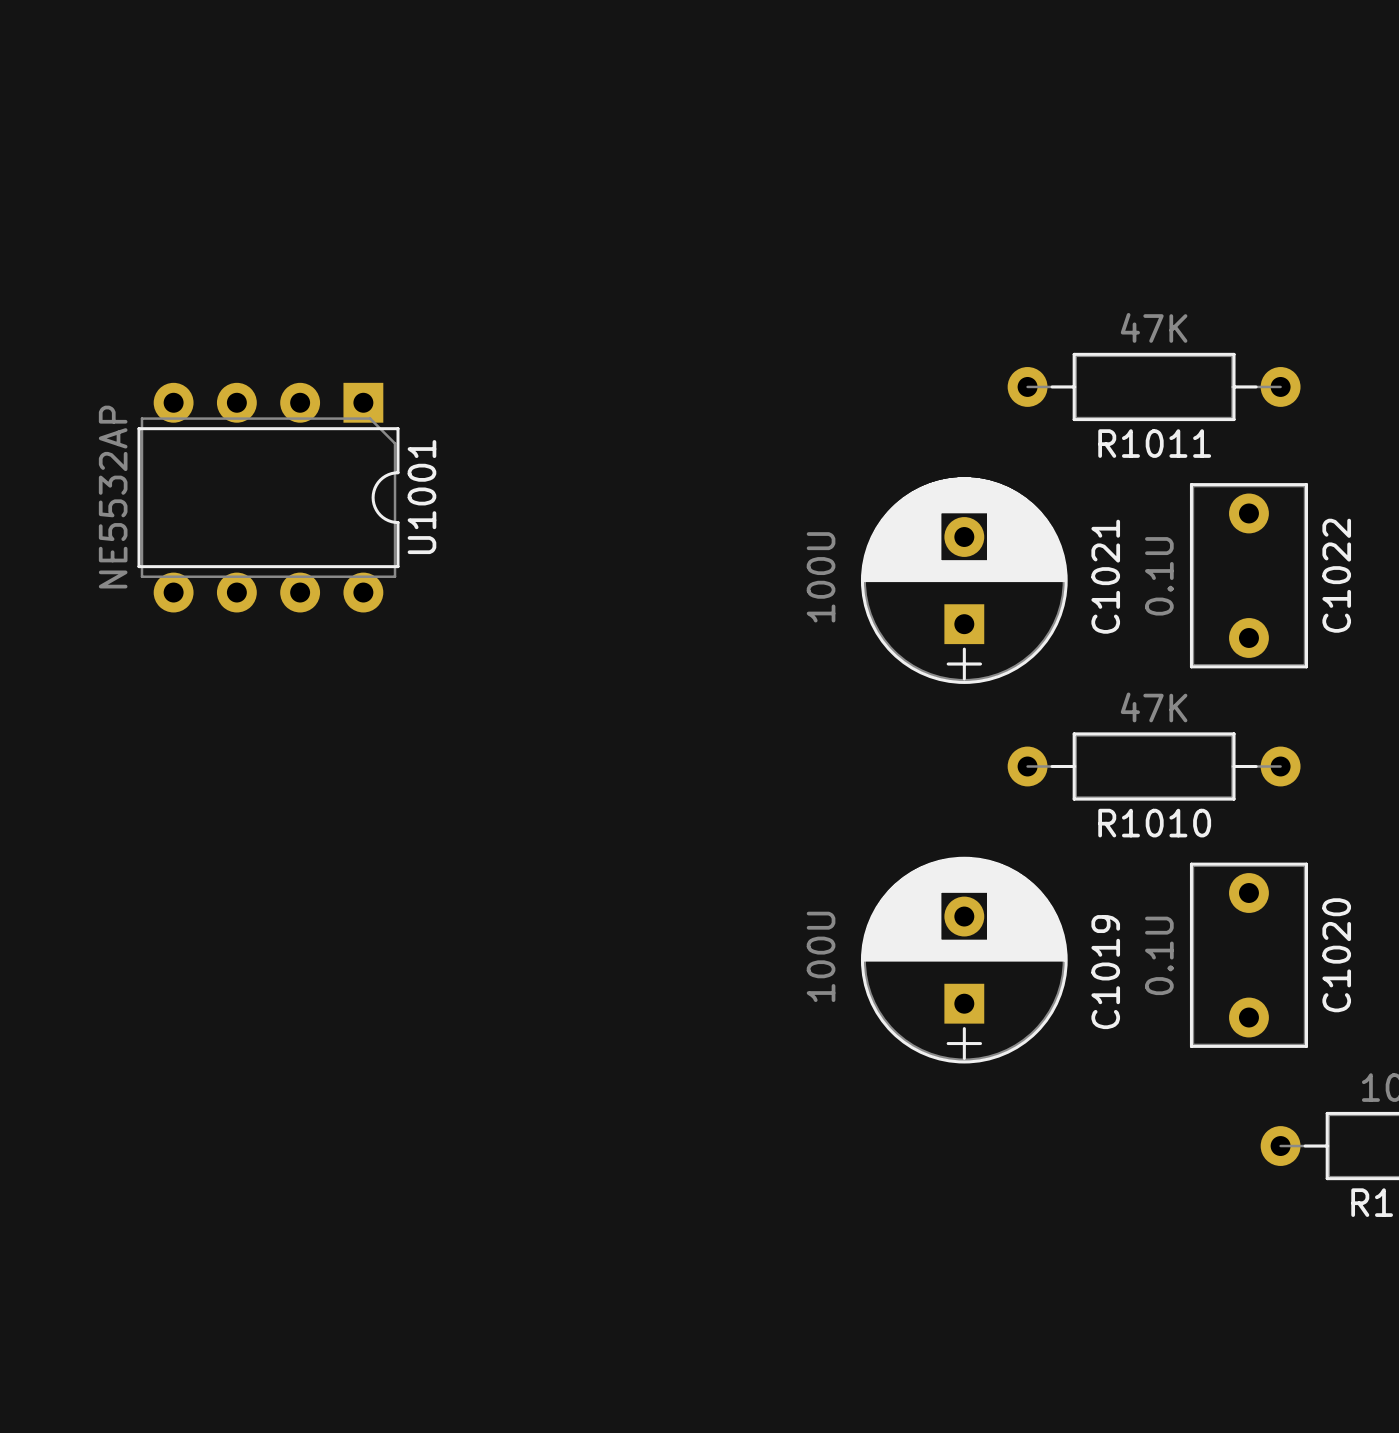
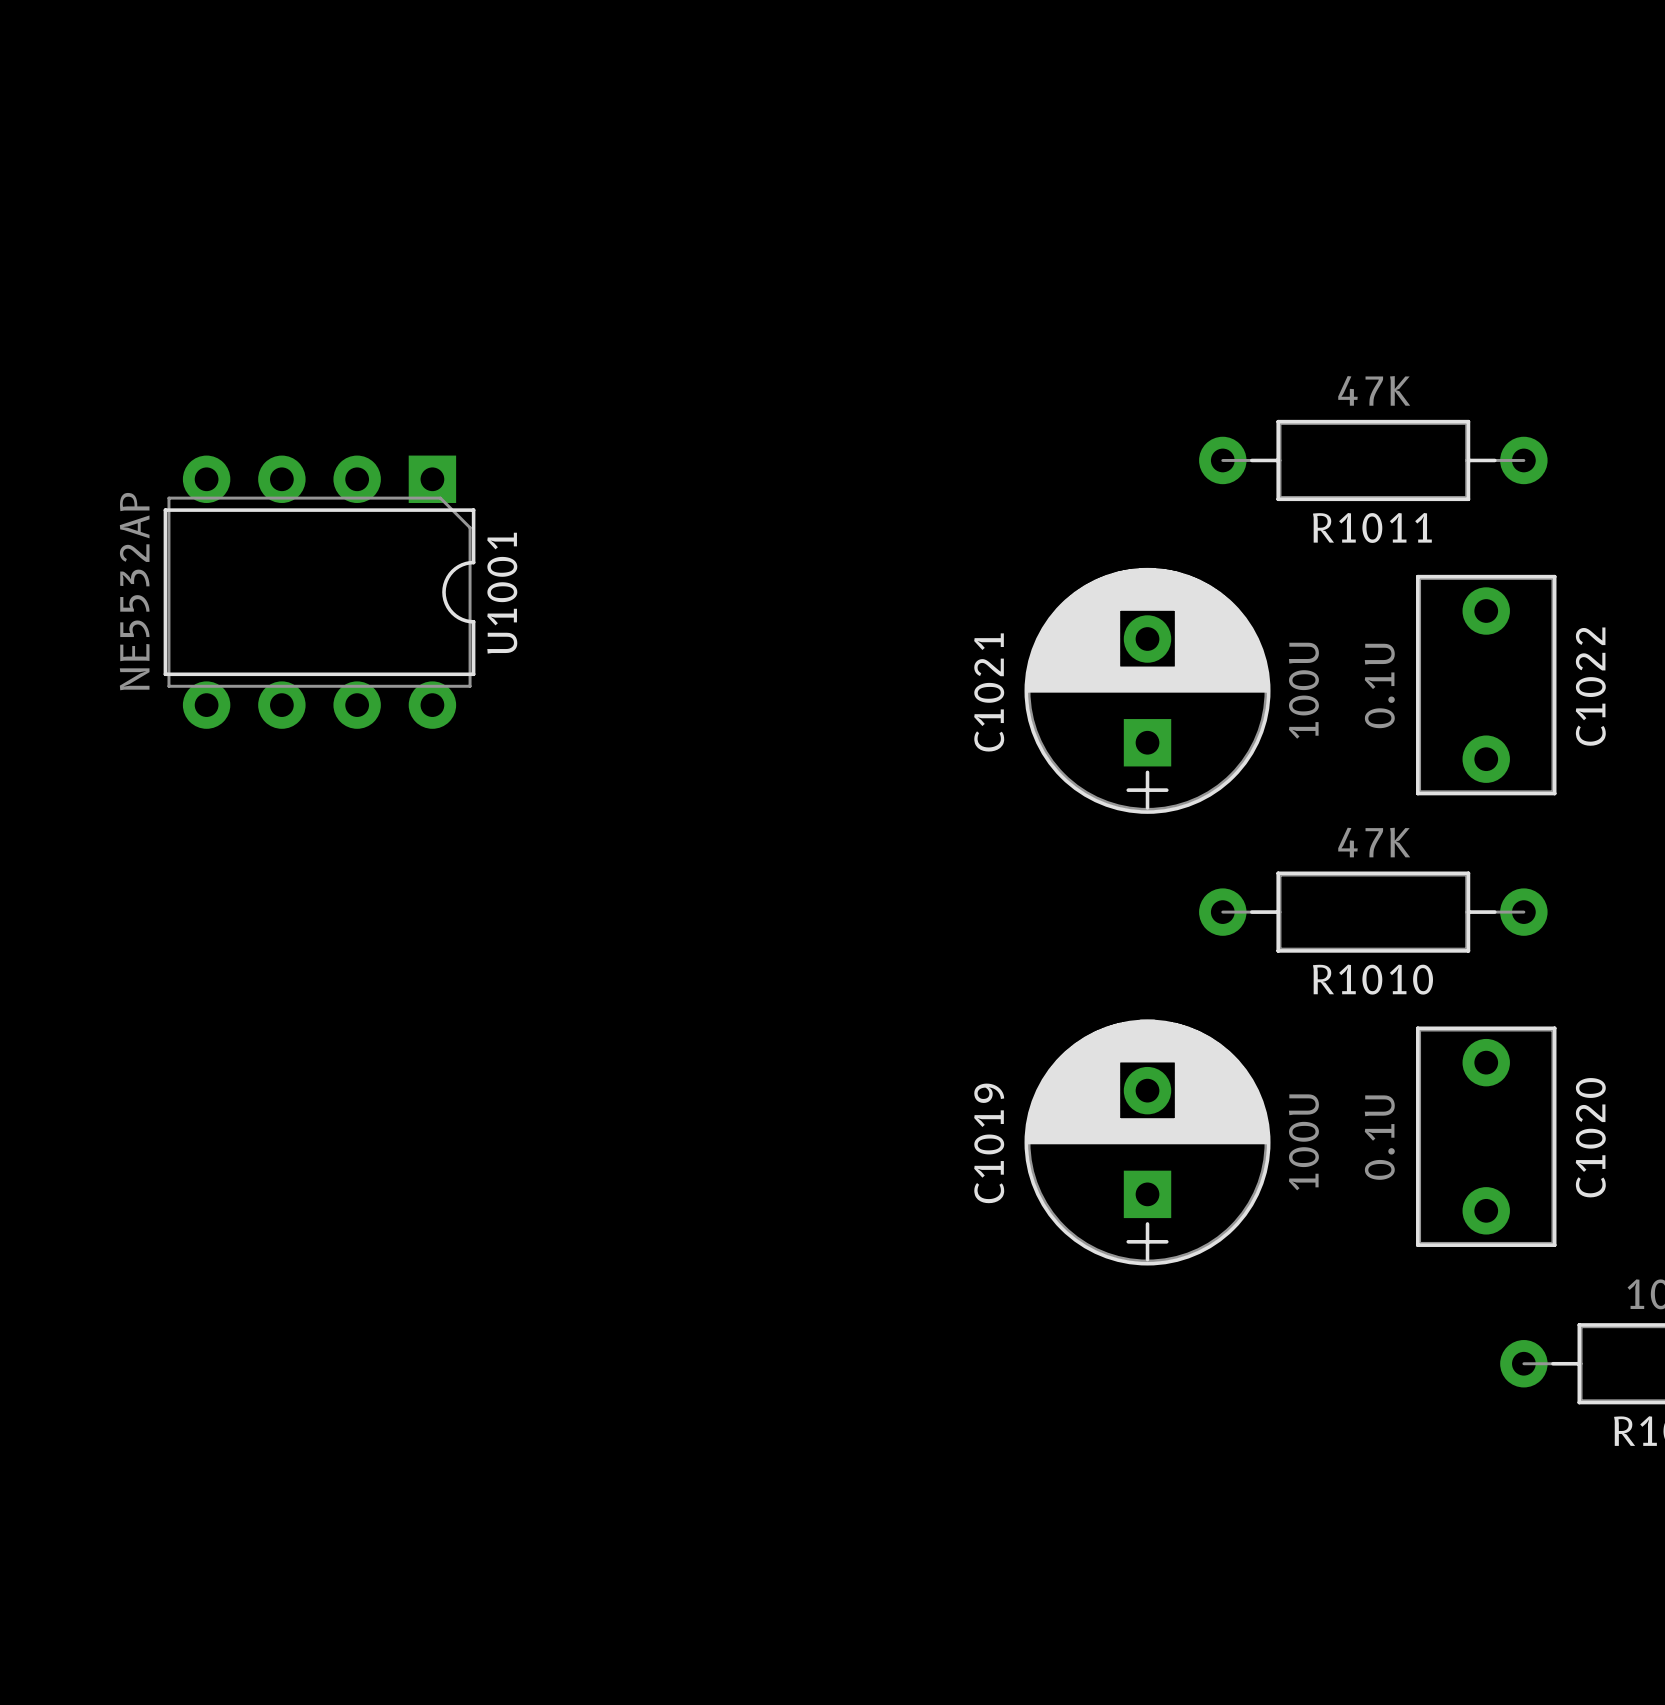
C1021 name position: C1021 (1105, 576) -> C1021 (989, 692)
C1021 value position: 100U (821, 577) -> 100U (1303, 690)
C1019 value position: 100U (821, 956) -> 100U (1303, 1142)
C1019 name position: C1019 (1105, 972) -> C1019 (989, 1143)

